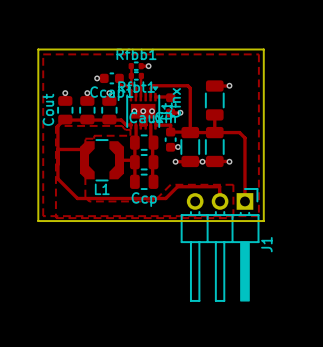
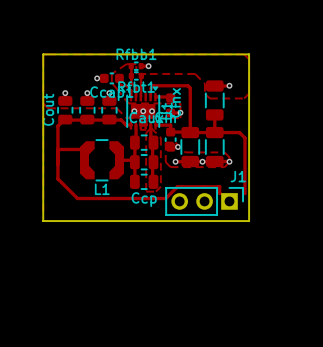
zone outline: (244, 54) (258, 54) (258, 216) (43, 216) -> (244, 54) (249, 59) (249, 93) (244, 98) (209, 98) (204, 93) (204, 83) (195, 73) (136, 73) (136, 64) (126, 64) (111, 73) (111, 82) (128, 103) (180, 103) (180, 118) (146, 117) (146, 129) (140, 129) (140, 117) (126, 117) (116, 108) (48, 108) (43, 103)
zone outline: (55, 125) (122, 125) (125, 129) (130, 129) (130, 135) (94, 135) (94, 138) (85, 138) (85, 197) (89, 201) (154, 201) (170, 184) (233, 184) (233, 217) (55, 218) (55, 125) -> none
zone outline: none -> (151, 127) (160, 137) (160, 186) (155, 191) (146, 191) (146, 132) (151, 127)
zone outline: none -> (165, 142) (175, 142) (185, 152) (224, 152) (229, 157) (229, 162) (224, 167) (170, 167) (165, 162) (165, 142)
J1 footprint: [181, 188, 260, 302] -> [165, 187, 244, 216]
board edge: (43, 221) (38, 221) (38, 49) (263, 49) (263, 221) (249, 221) -> (43, 221) (43, 54) (249, 54) (249, 221)
J1 name position: J1 (266, 244) -> J1 (238, 176)

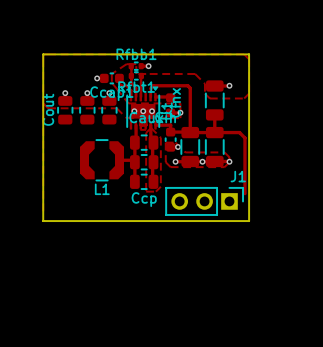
track: (131, 125) (126, 124) (121, 120) (64, 119) (57, 126) (57, 178) (77, 198) (165, 198) (177, 186) (219, 186) (220, 193) -> none
track: (57, 149) (84, 149) -> none

